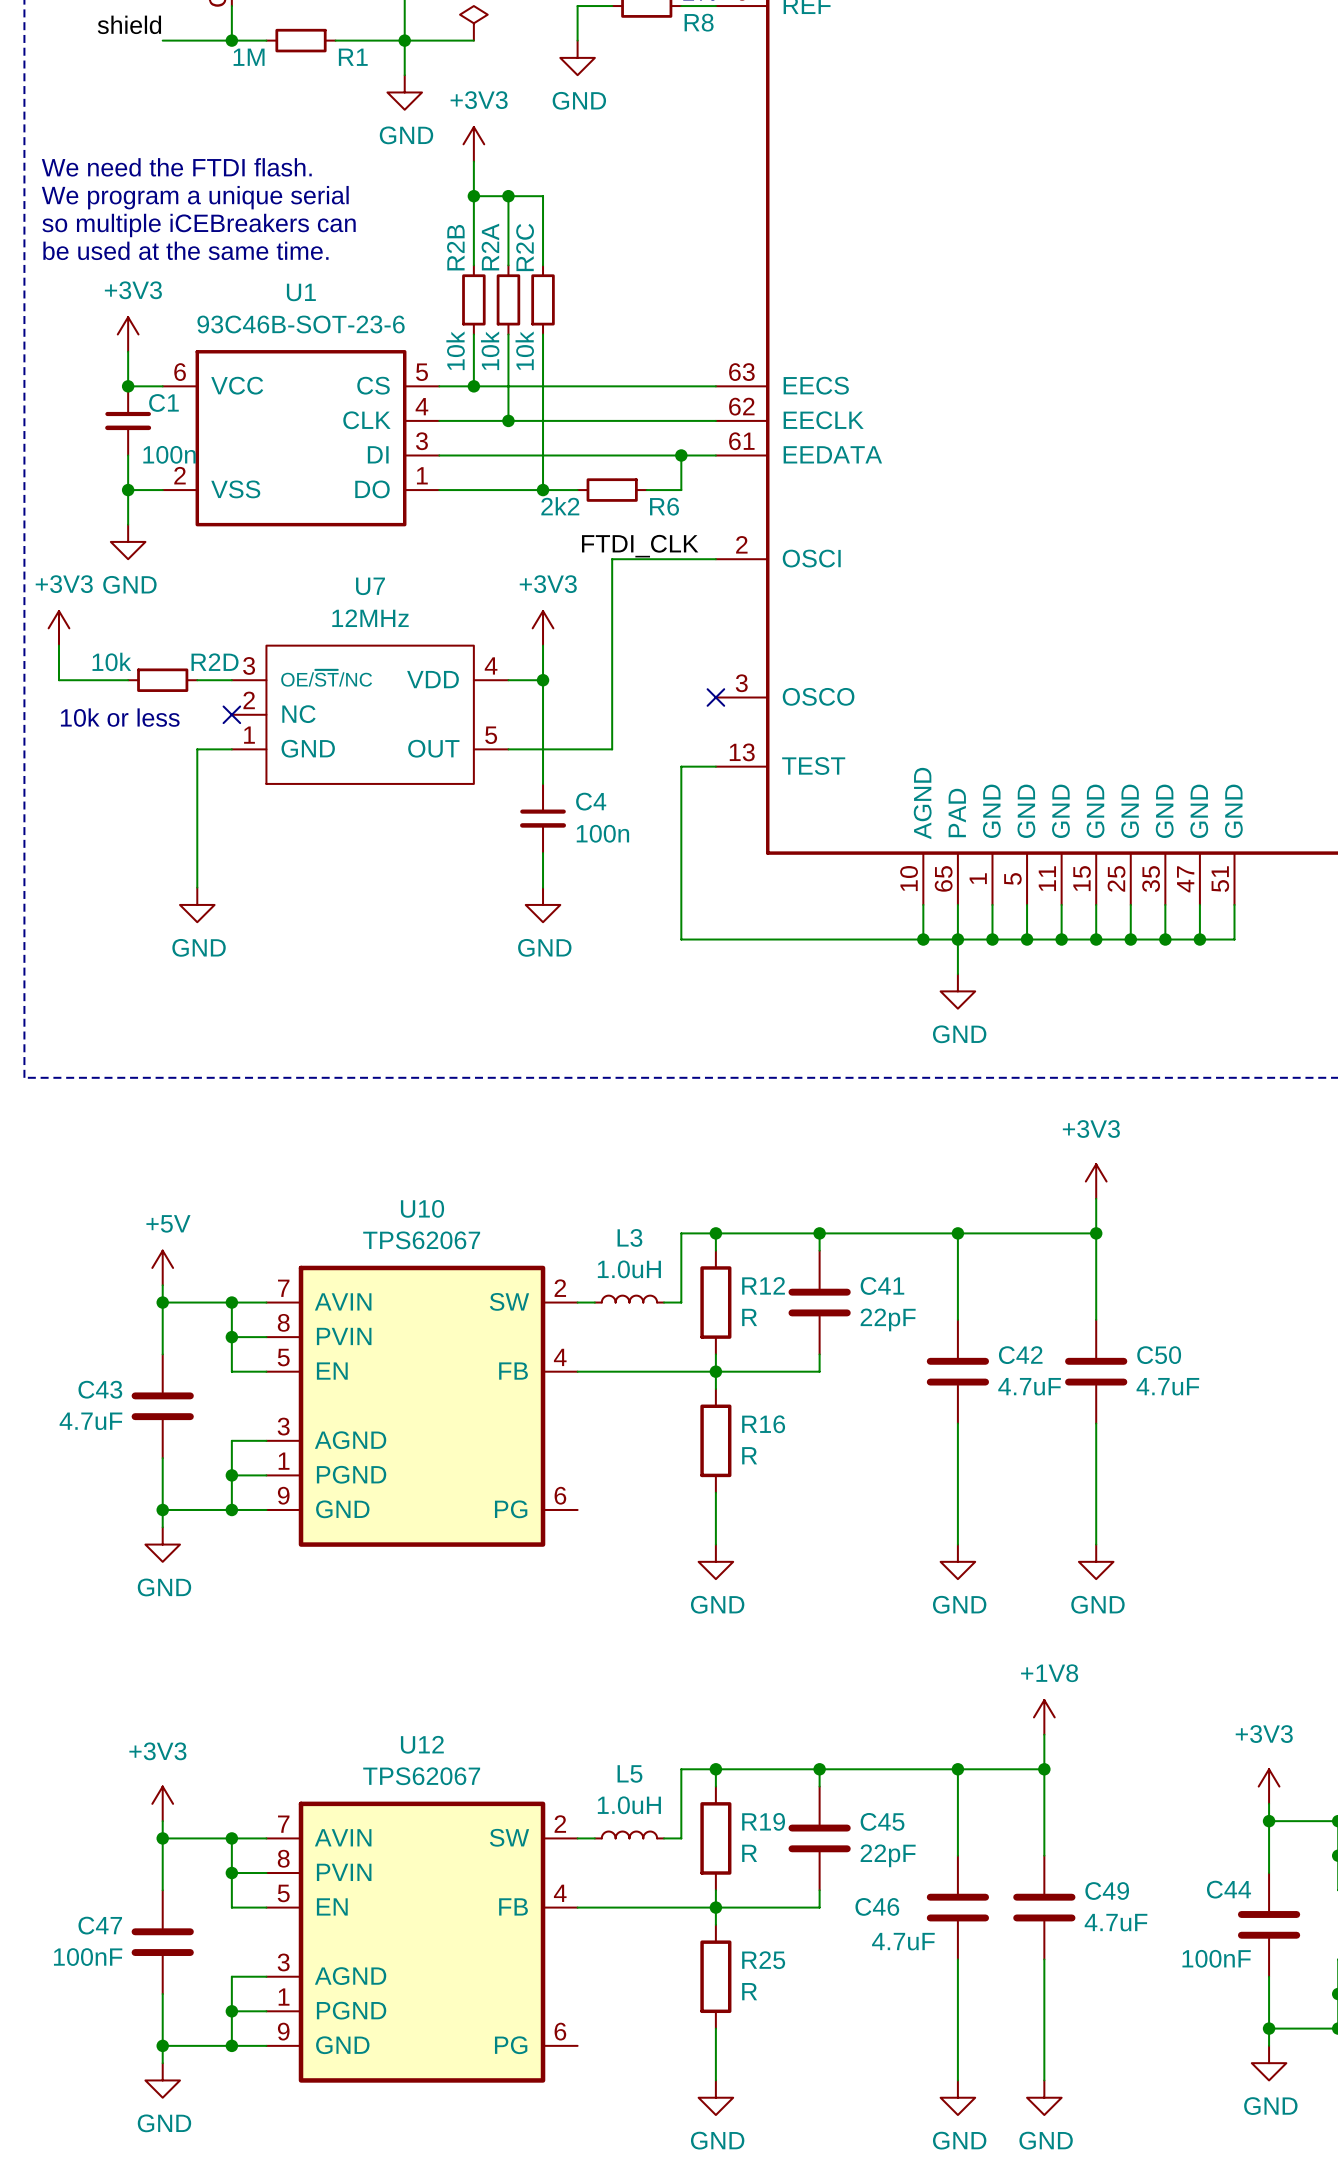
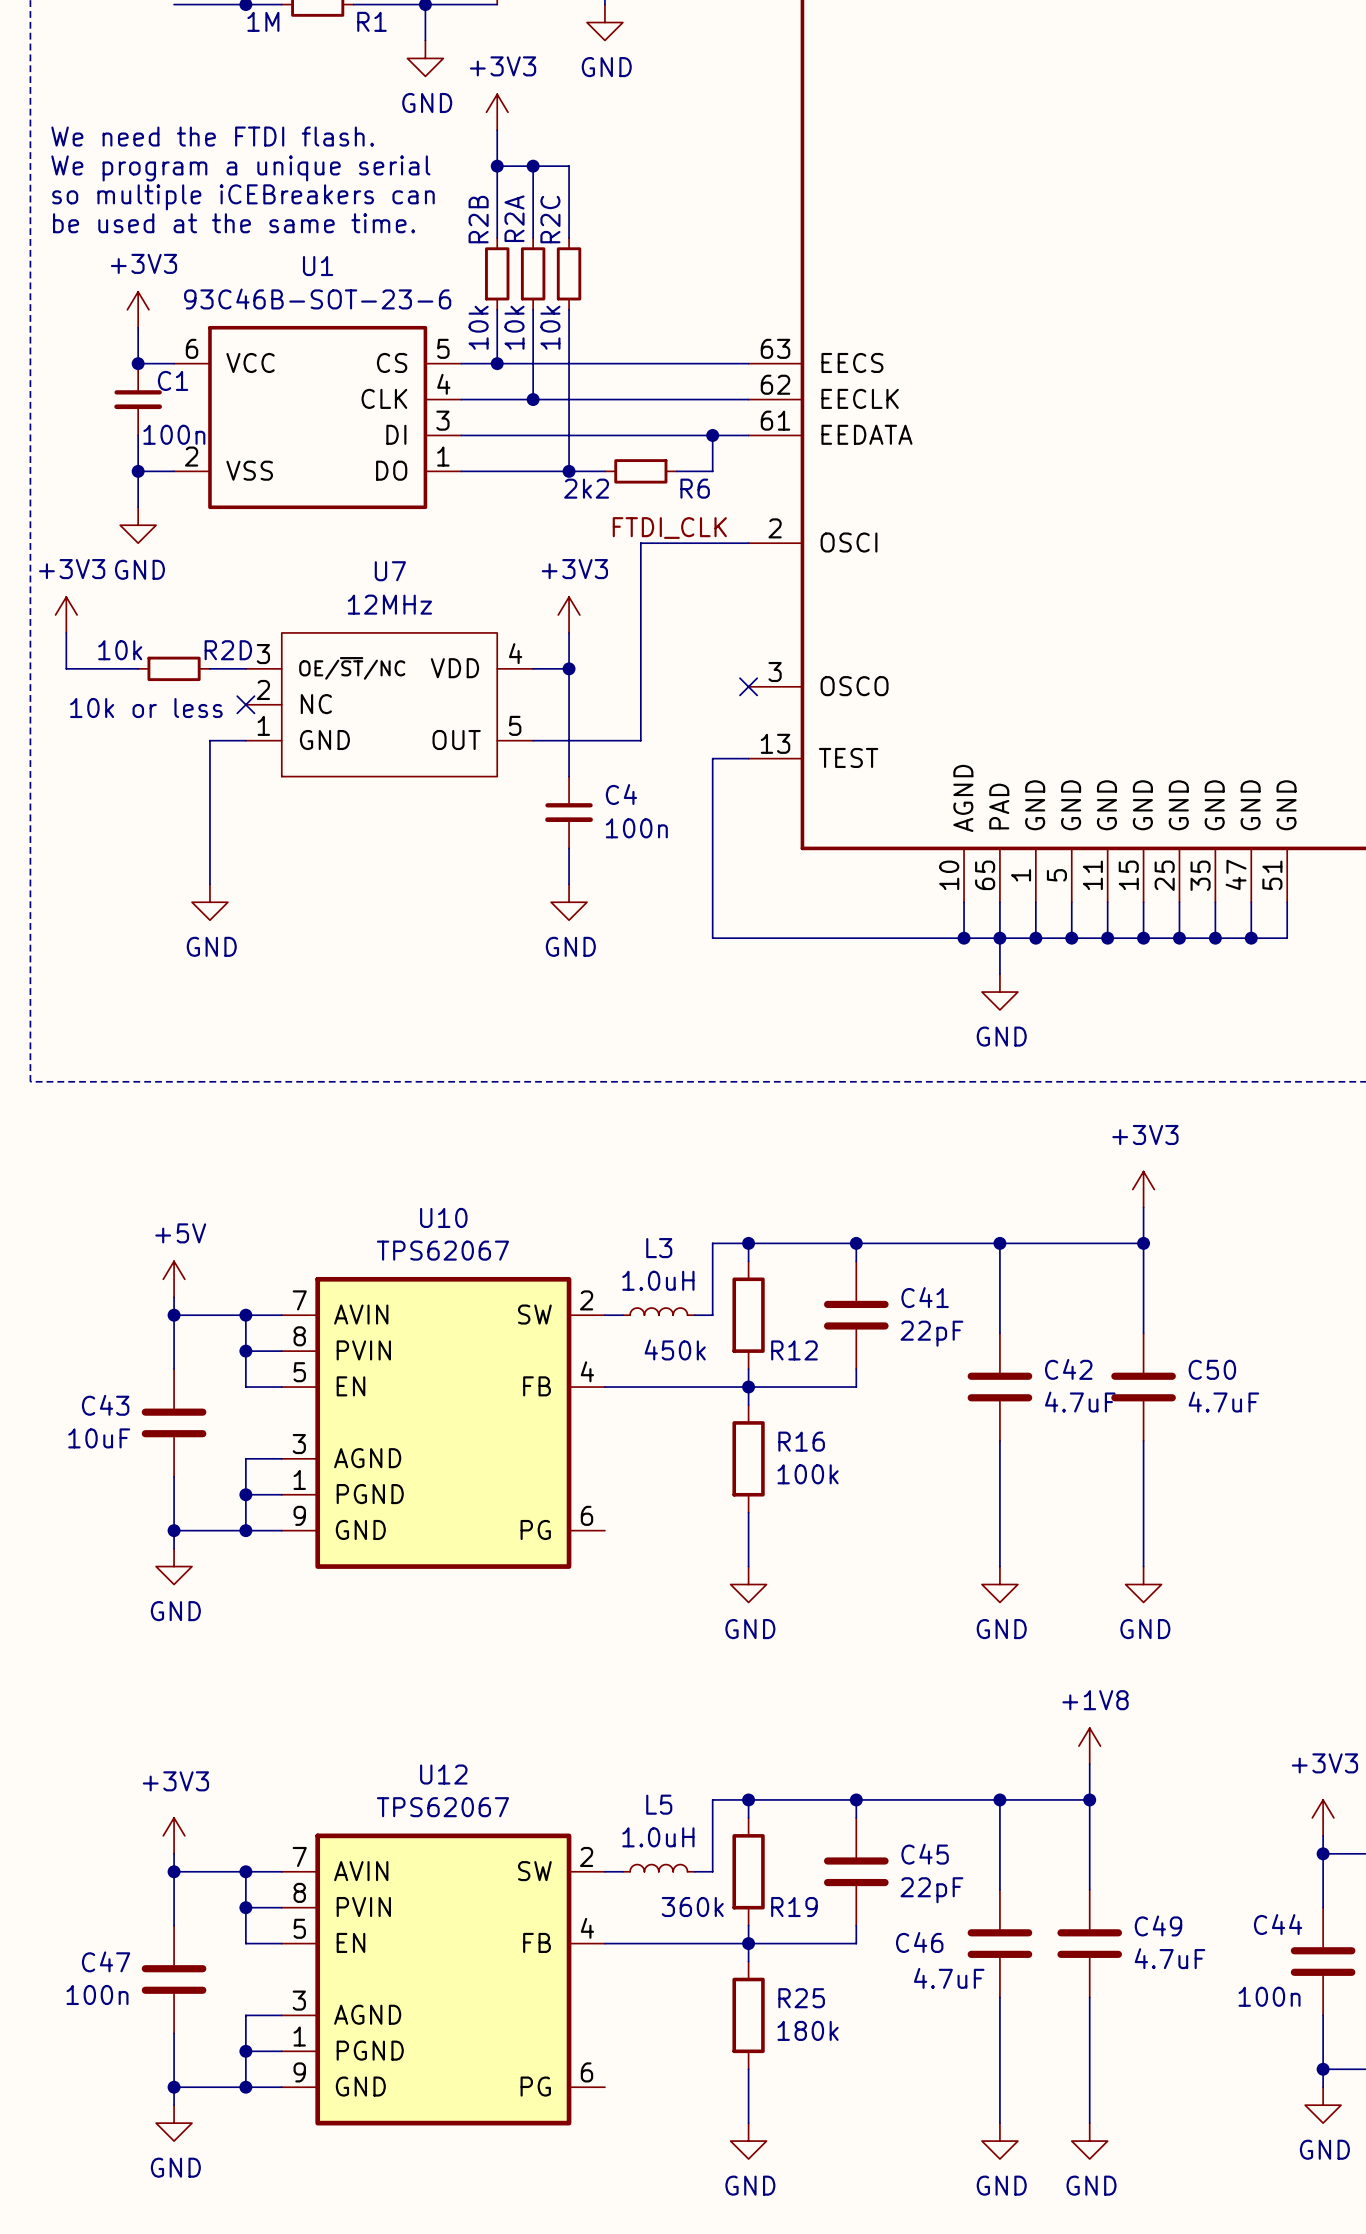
R12 name position: R12 (763, 1285) -> R12 (794, 1350)
R12 value: R (749, 1317) -> 450k (675, 1350)
C43 value: 4.7uF (90, 1421) -> 10uF (99, 1438)
R16 value: R (749, 1455) -> 100k (808, 1474)
R19 name position: R19 (763, 1821) -> R19 (794, 1907)
R19 value: R (749, 1853) -> 360k (692, 1907)
C47 value: 100nF (88, 1957) -> 100n (97, 1994)
C44 value: 100nF (1216, 1958) -> 100n (1269, 1996)
R25 value: R (749, 1991) -> 180k (808, 2030)

